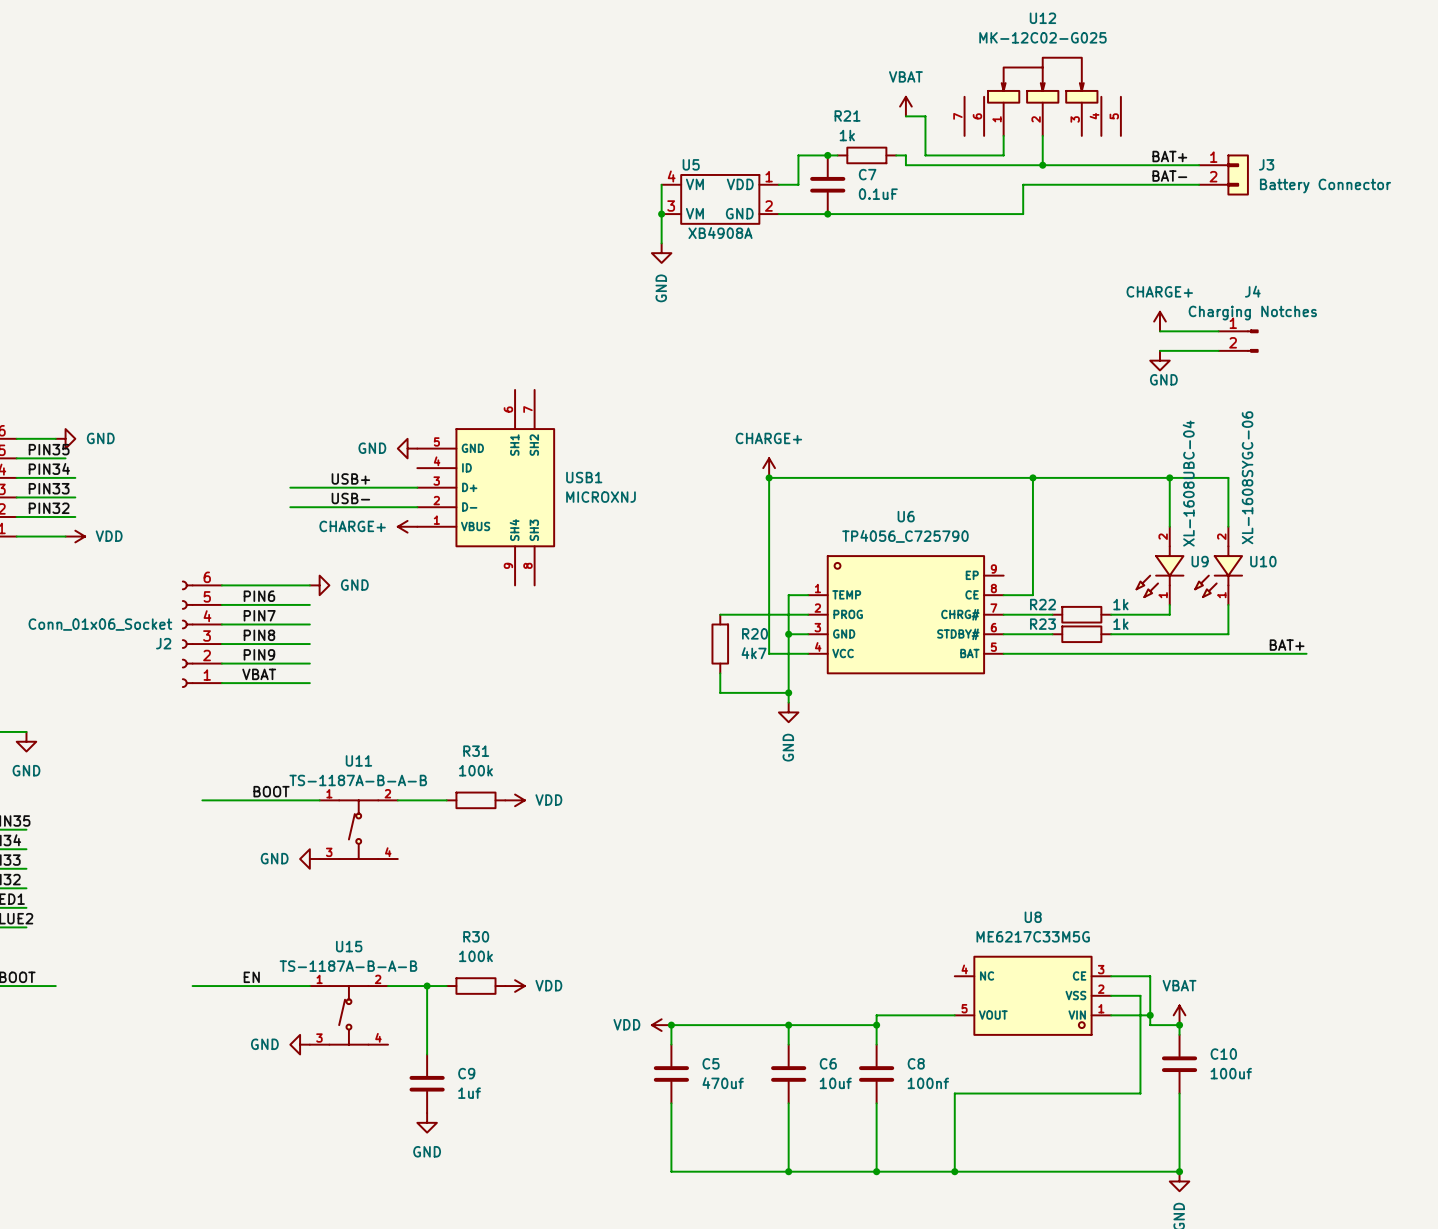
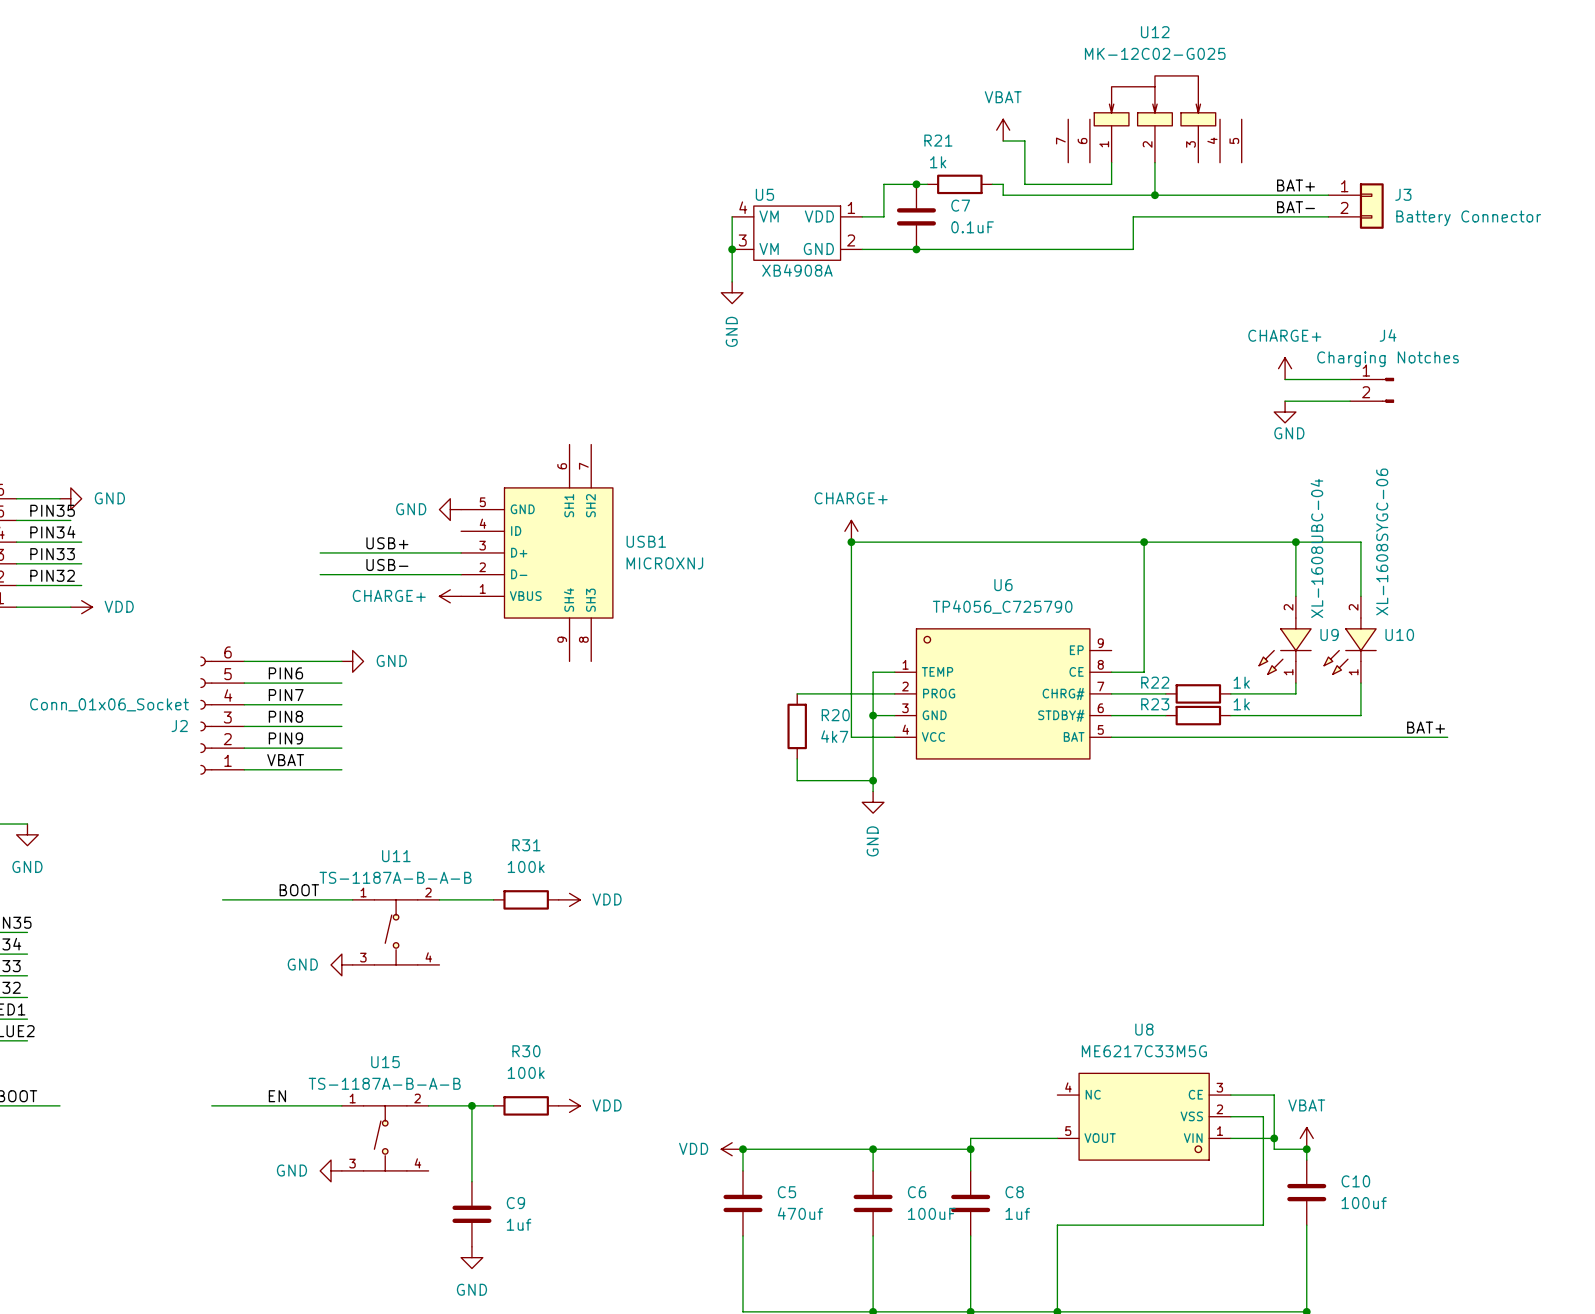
C6 value: 10uf (835, 1083) -> 100uF (931, 1213)
C8 value: 100nf (928, 1083) -> 1uf (1017, 1213)

